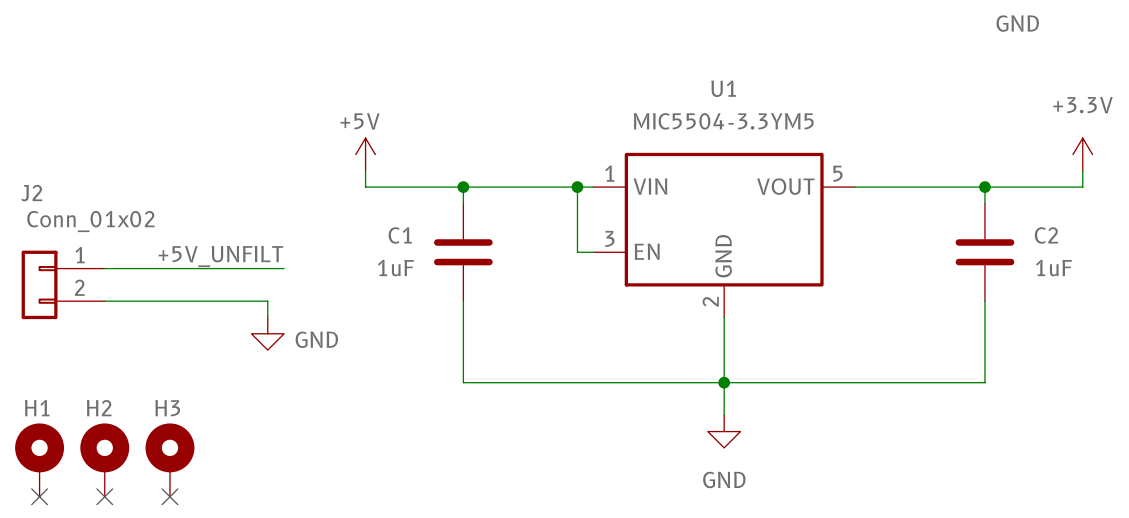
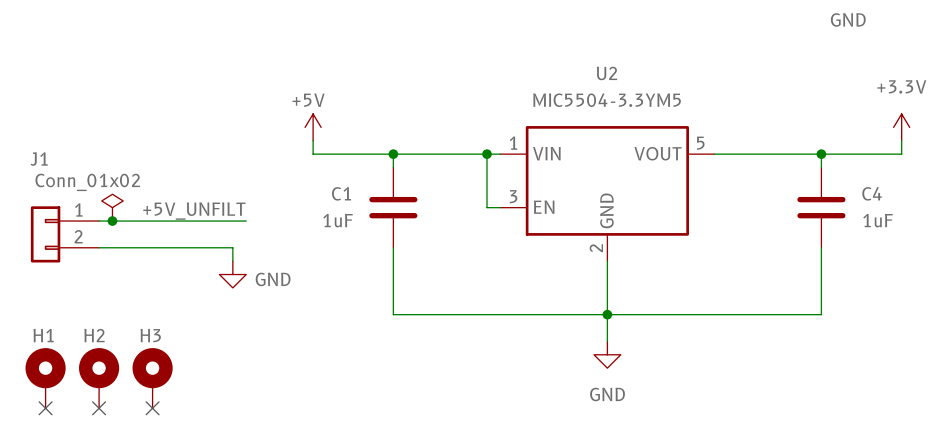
U1 name: U1 (723, 88) -> U2 (606, 73)
J2 name: J2 (31, 193) -> J1 (39, 159)
C2 name: C2 (1046, 235) -> C4 (872, 193)
power symbol: none -> (112, 207)
junction: none -> (112, 221)

